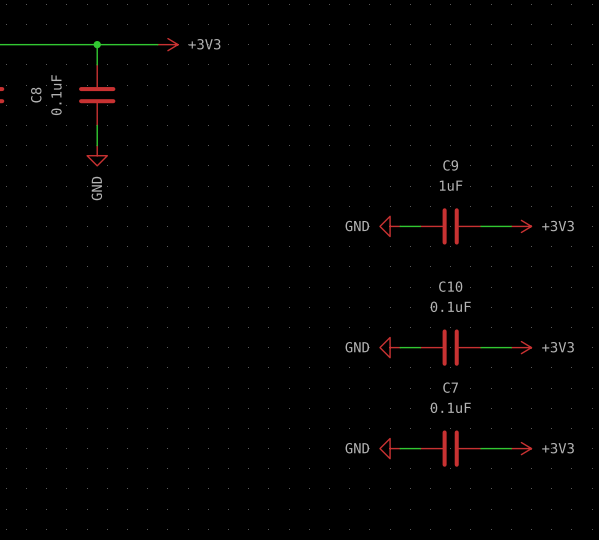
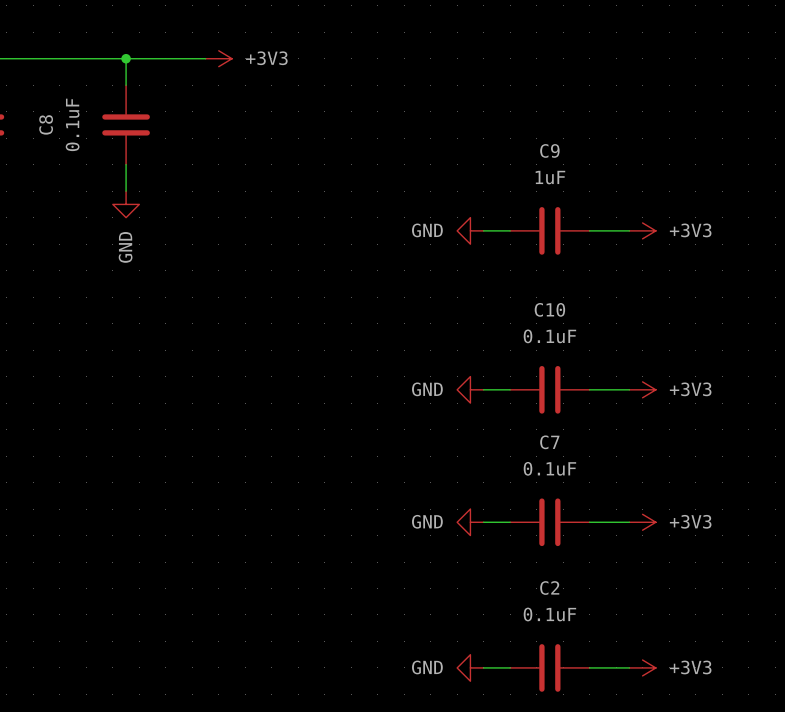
power symbol: none -> GND (470, 230)
power symbol: none -> +3V3 (642, 230)
power symbol: GND (390, 226) -> none
wire: (400, 226) (420, 226) -> (483, 230) (510, 230)
C9 position: (450, 226) -> (549, 230)
wire: (480, 226) (511, 226) -> (589, 230) (629, 230)
power symbol: +3V3 (521, 226) -> none
power symbol: none -> GND (470, 389)
power symbol: none -> +3V3 (642, 389)
power symbol: GND (390, 347) -> none
wire: (400, 347) (420, 347) -> (483, 389) (510, 389)
C10 position: (450, 347) -> (549, 389)
wire: (480, 347) (511, 347) -> (589, 389) (629, 389)
power symbol: +3V3 (521, 347) -> none
power symbol: none -> GND (470, 522)
power symbol: none -> +3V3 (642, 522)
power symbol: GND (390, 448) -> none
wire: (400, 448) (420, 448) -> (483, 522) (510, 522)
C7 position: (450, 448) -> (549, 522)
wire: (480, 448) (511, 448) -> (589, 522) (629, 522)
power symbol: +3V3 (521, 448) -> none
power symbol: none -> GND (470, 667)
wire: none -> (483, 667) (510, 667)
C2: none -> 0.1uF (549, 667)
wire: none -> (589, 667) (629, 667)
power symbol: none -> +3V3 (642, 667)

